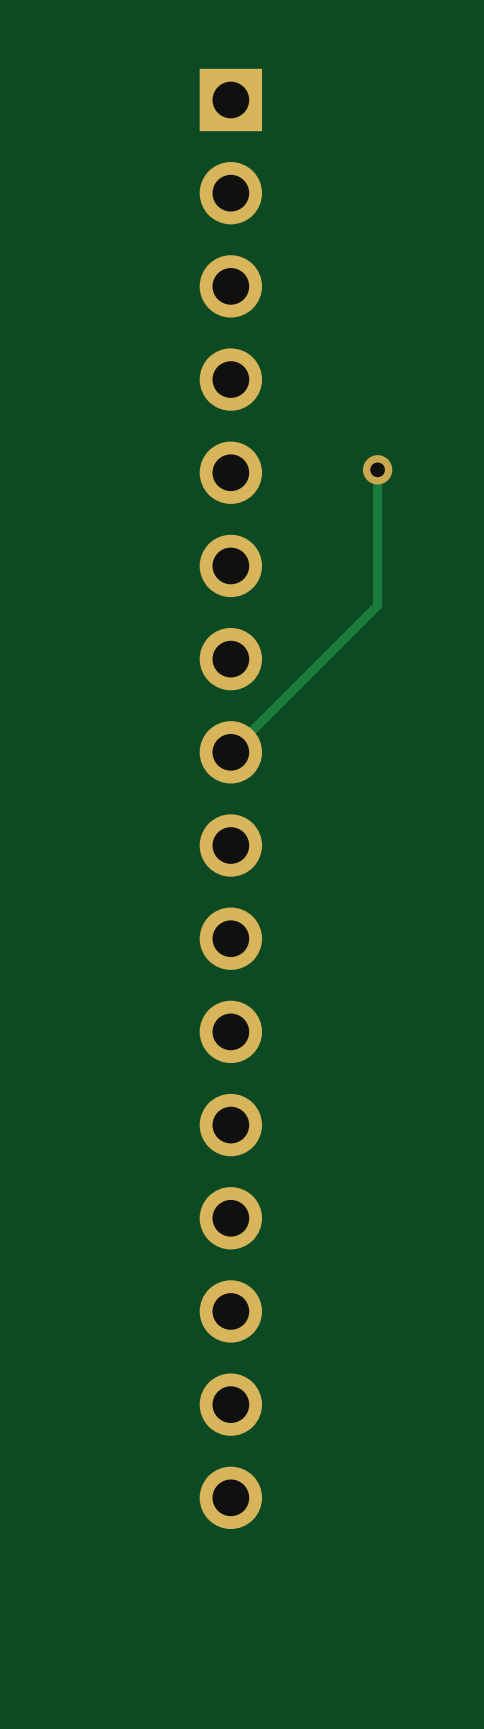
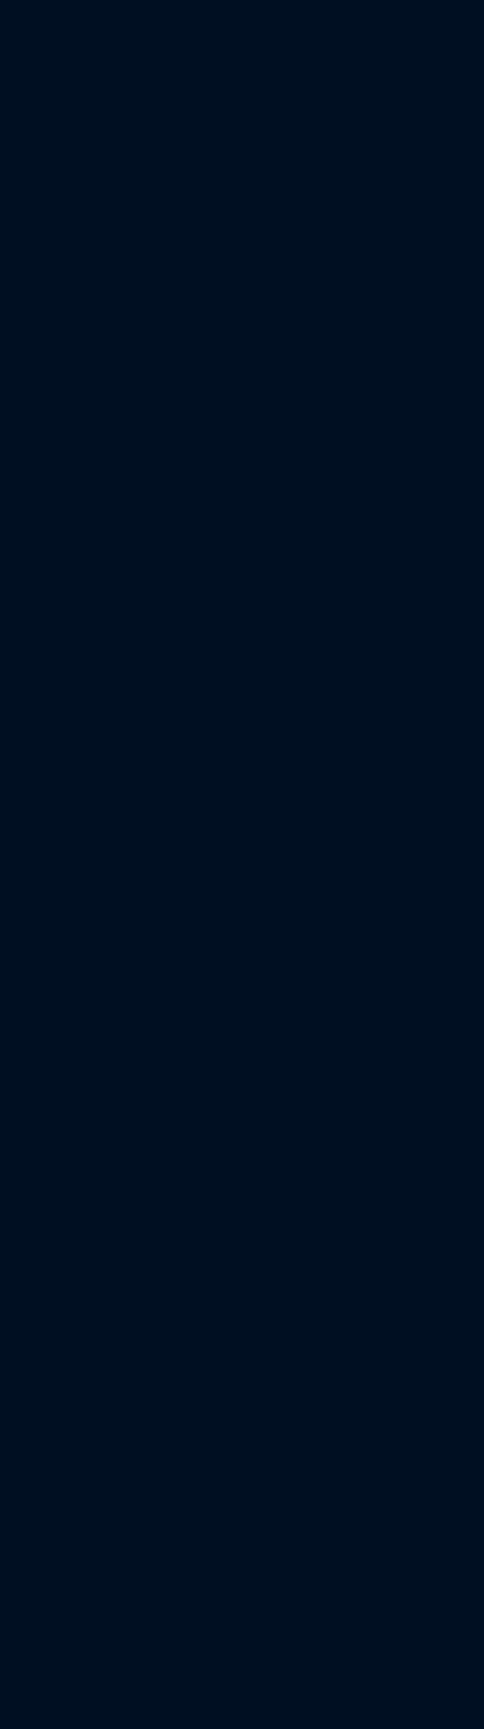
track: (377, 469) (377, 605) (230, 752) -> none
via: (377, 469) -> none
part: (230, 798) -> none

